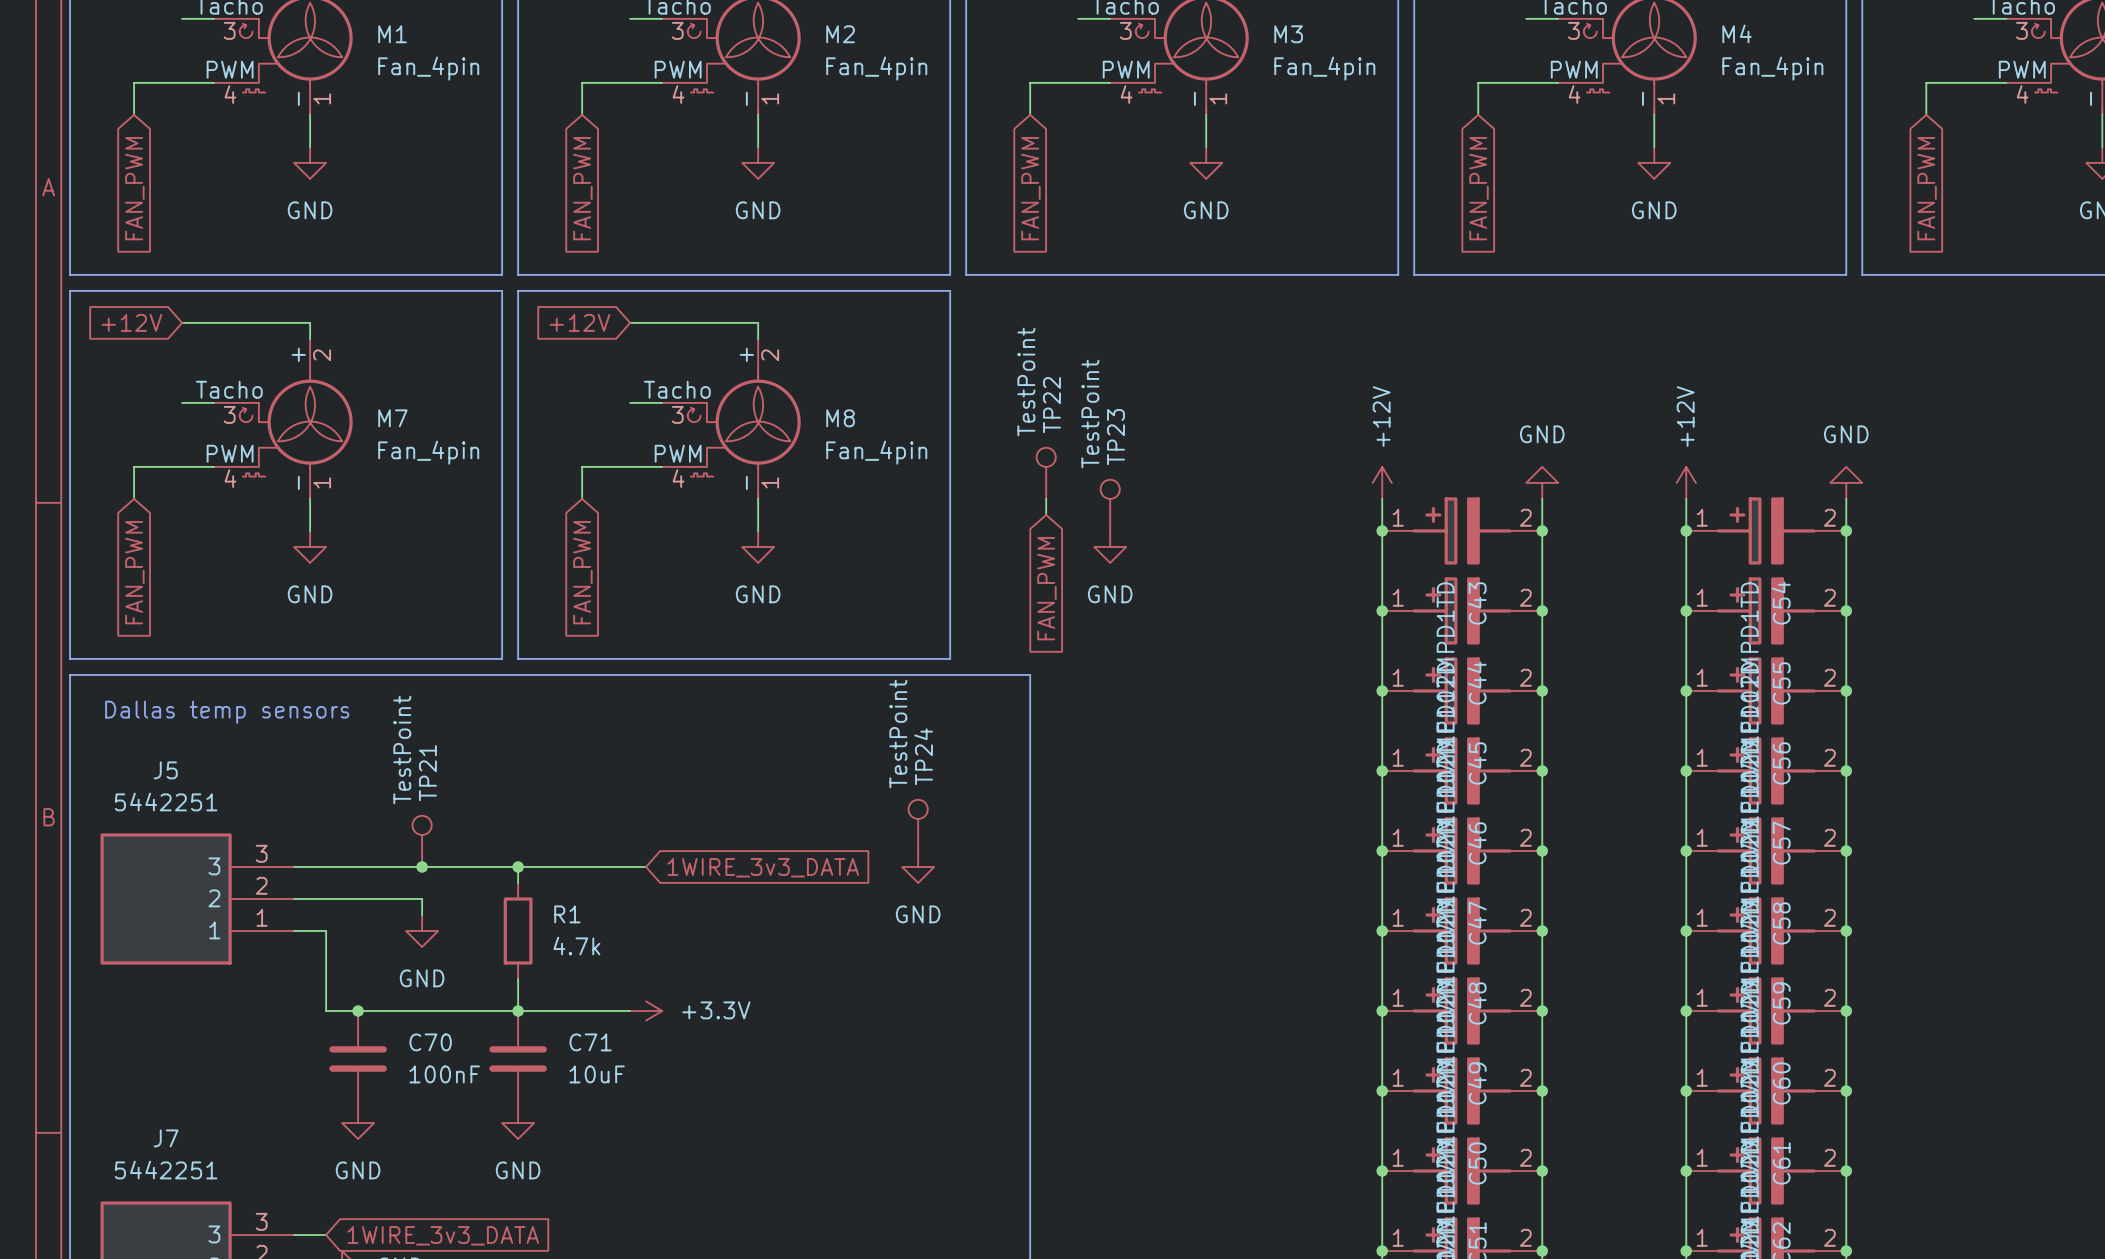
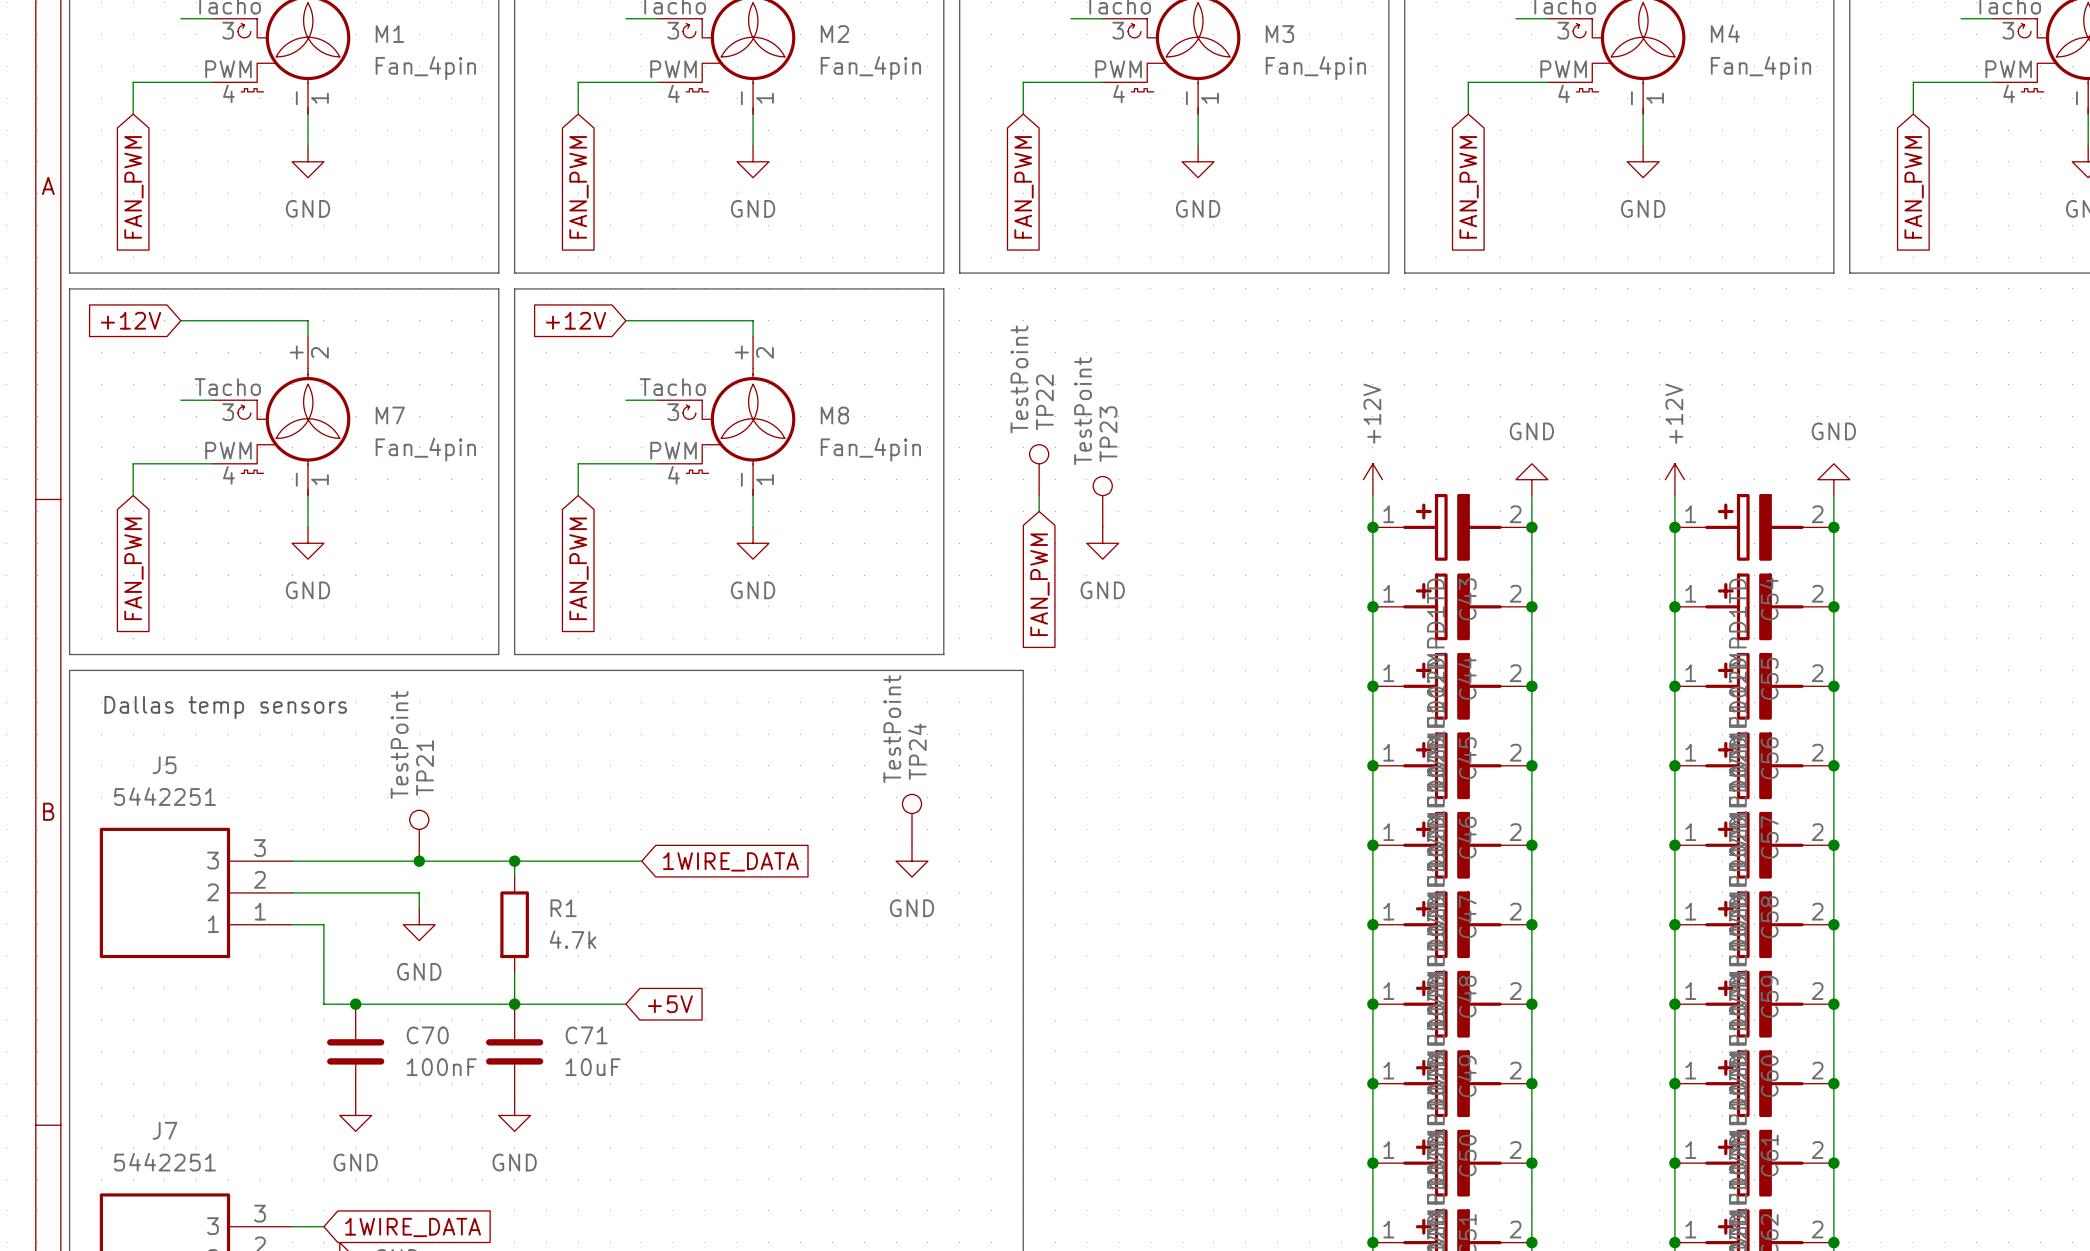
global label: 1WIRE_3v3_DATA (763, 867) -> 1WIRE_DATA (730, 861)
power symbol: +3.3V (646, 1011) -> none
global label: none -> +5V (670, 1004)
global label: 1WIRE_3v3_DATA (443, 1235) -> 1WIRE_DATA (413, 1227)

